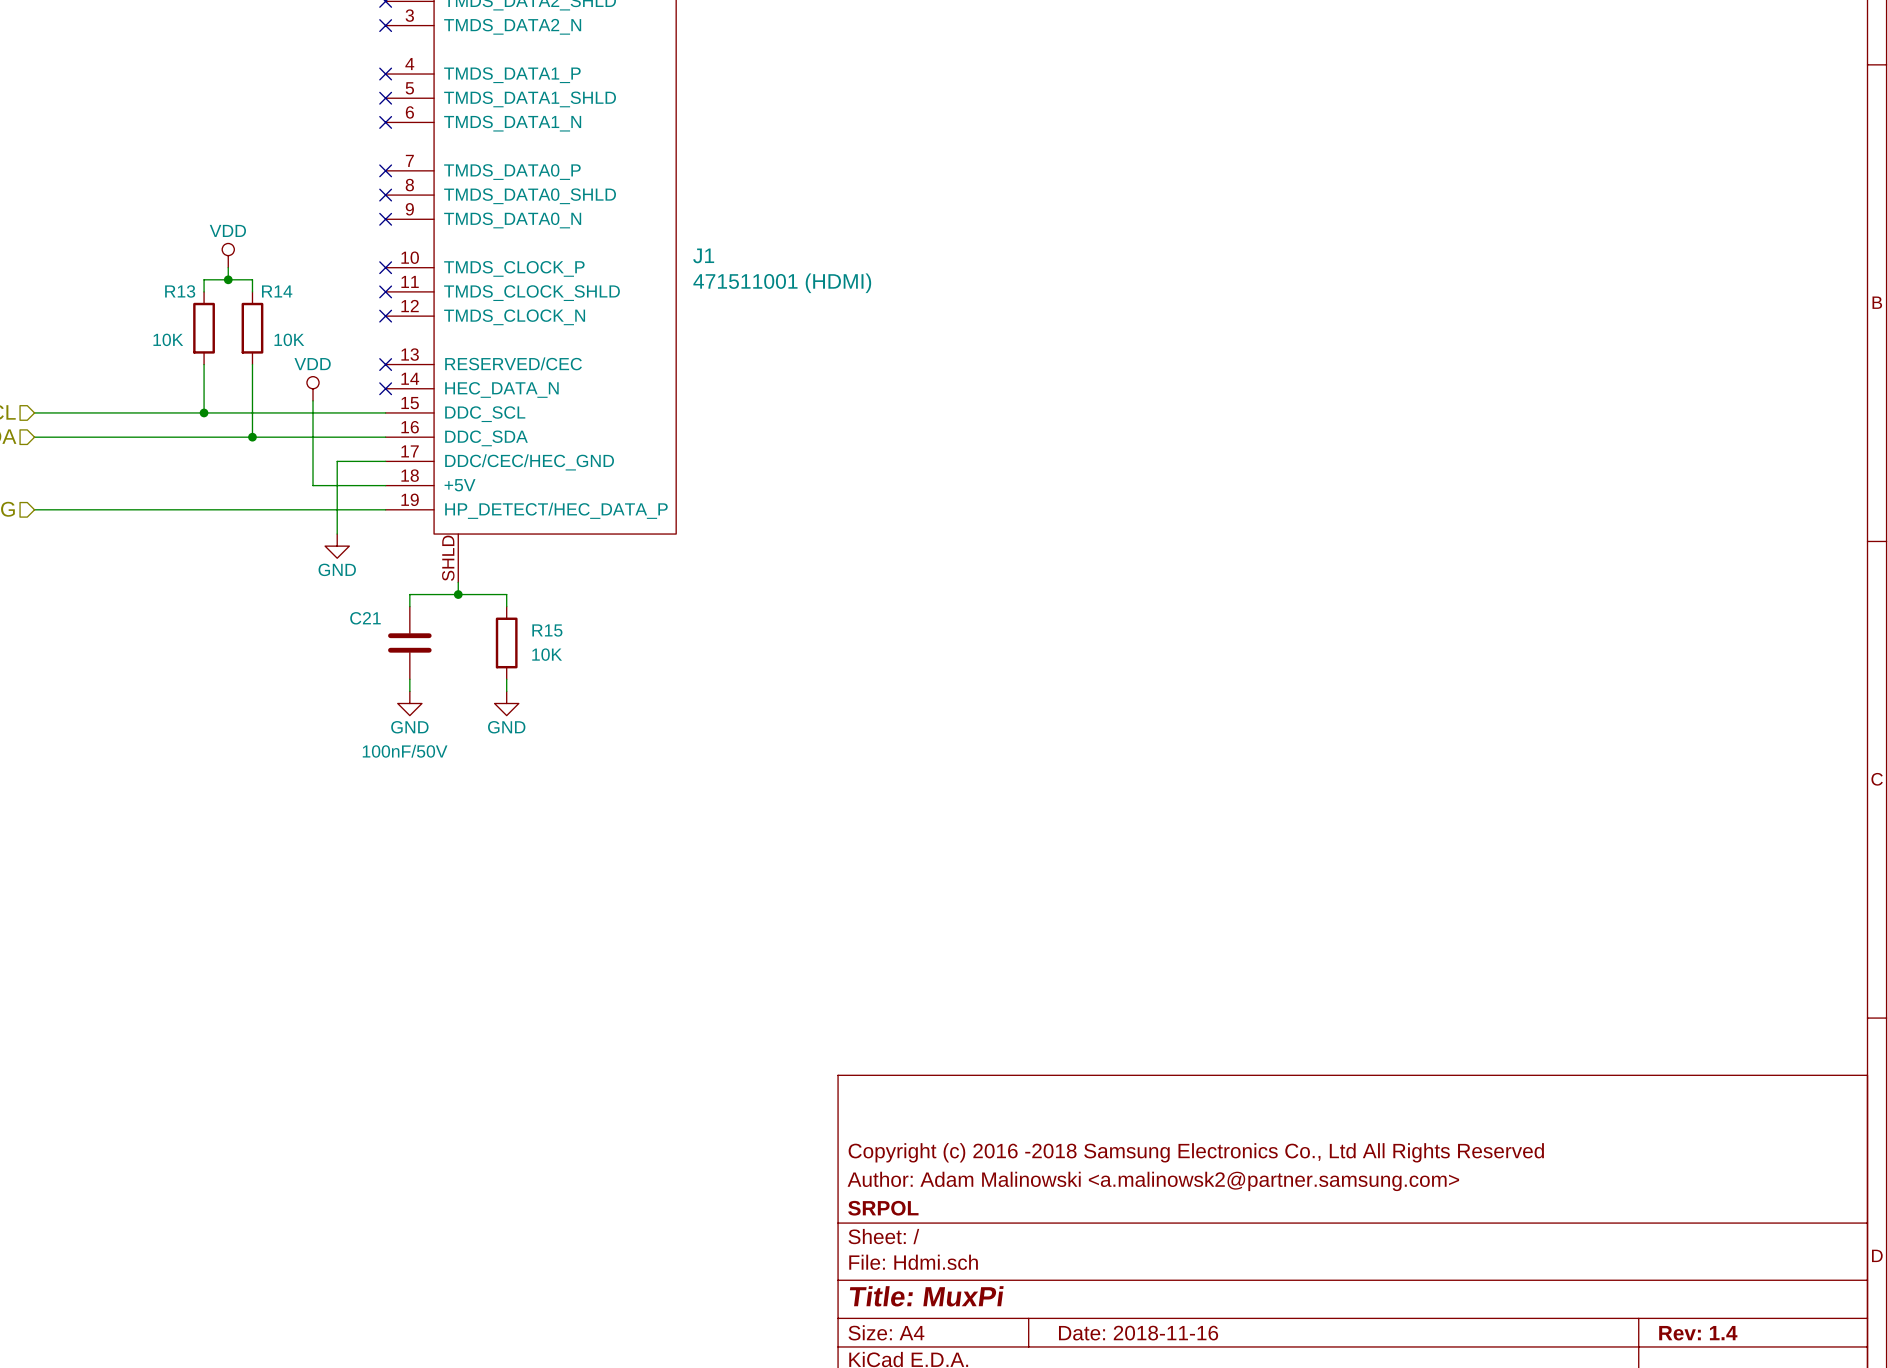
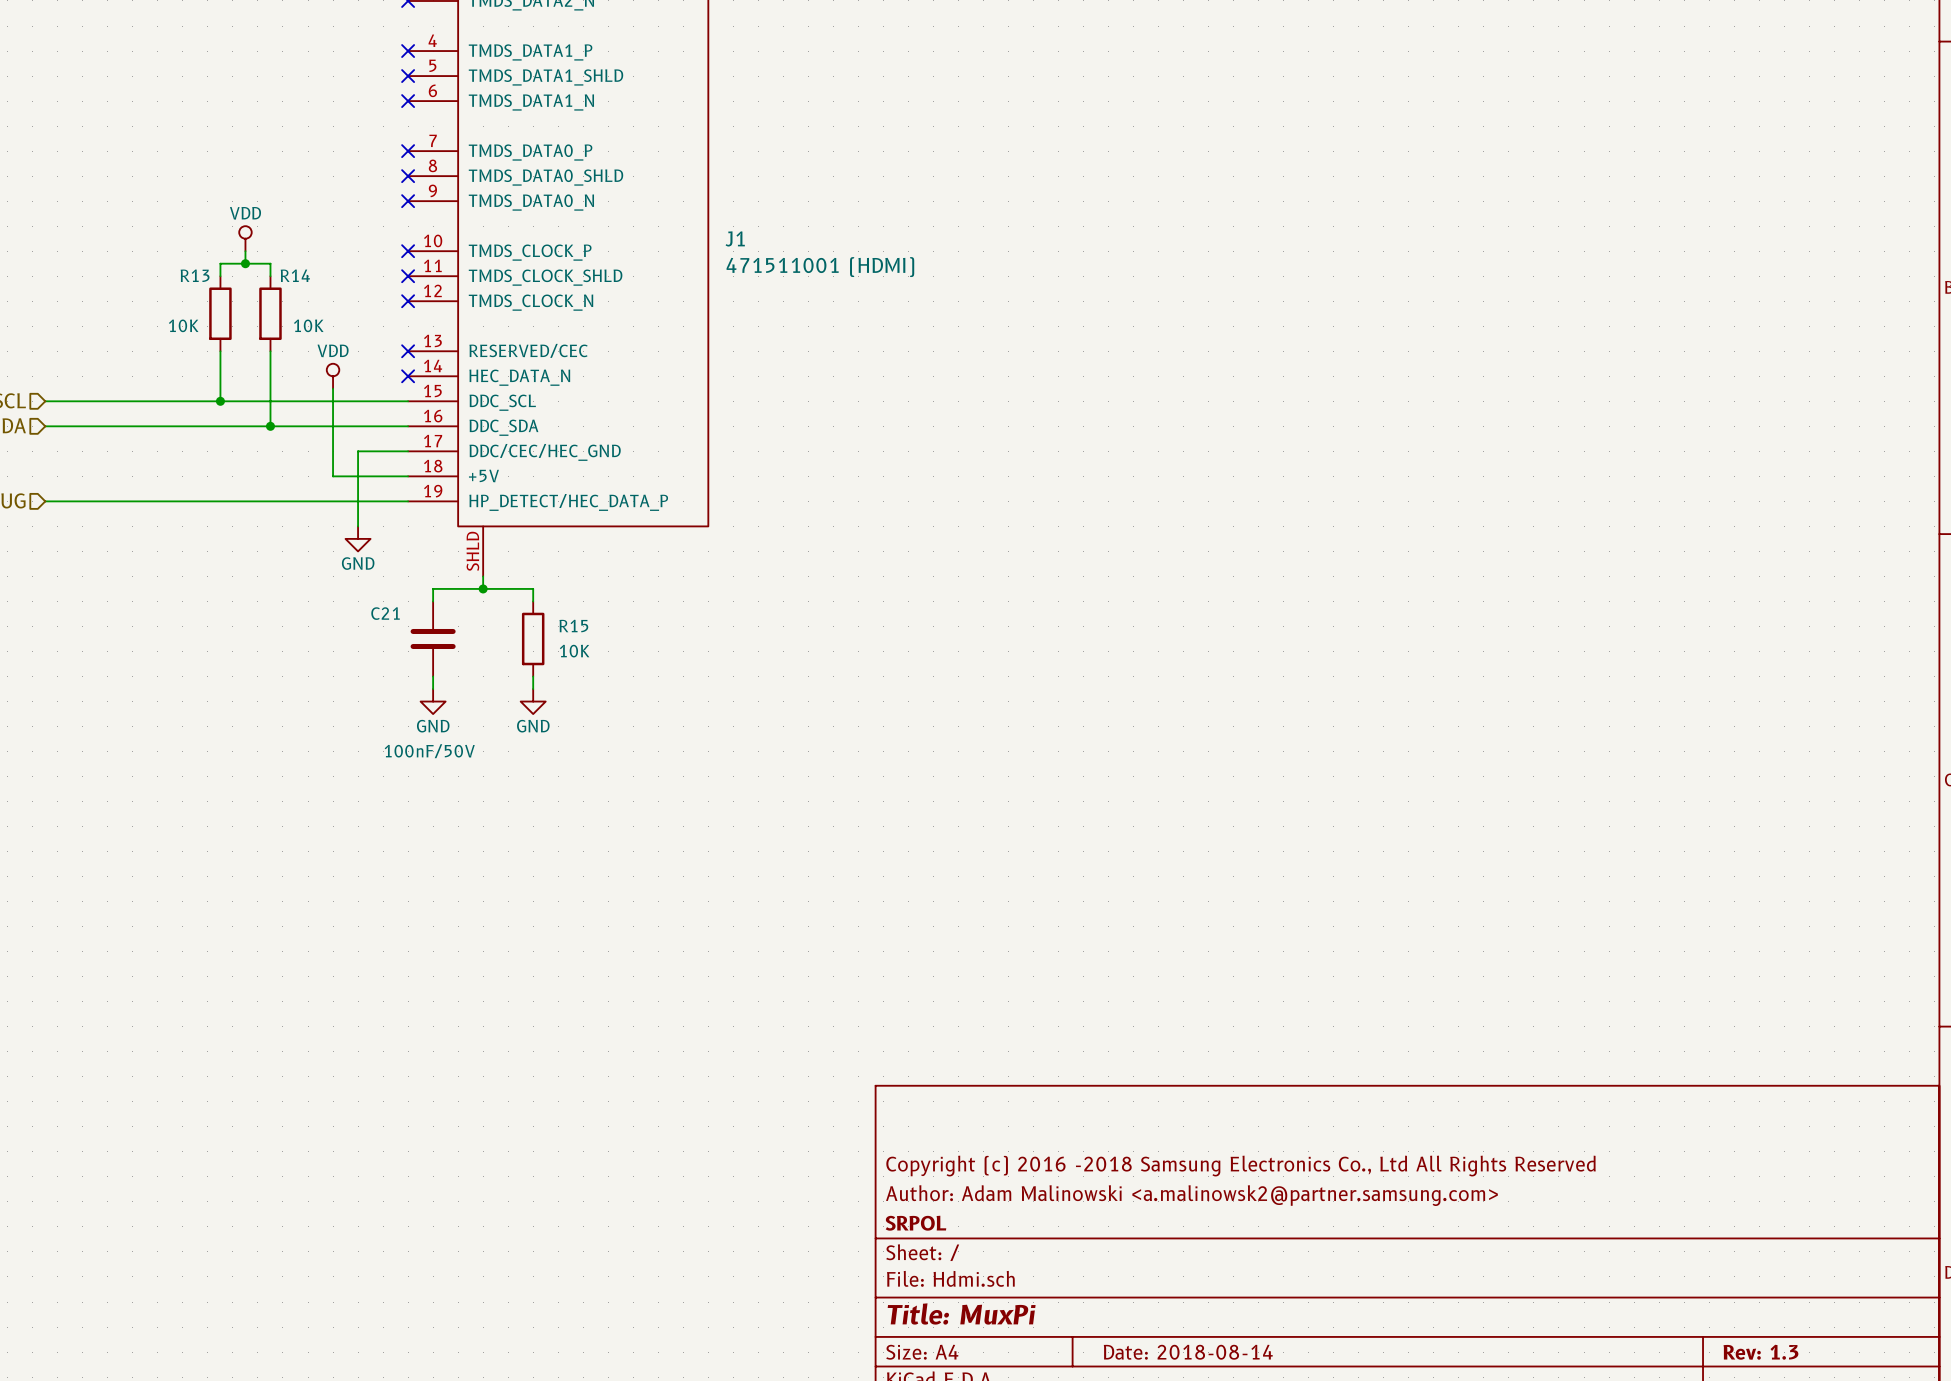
title block: Date: 2018-11-16 (1138, 1333) -> Date: 2018-08-14 (1188, 1352)
title block: Rev: 1.4 (1698, 1333) -> Rev: 1.3 (1760, 1352)

